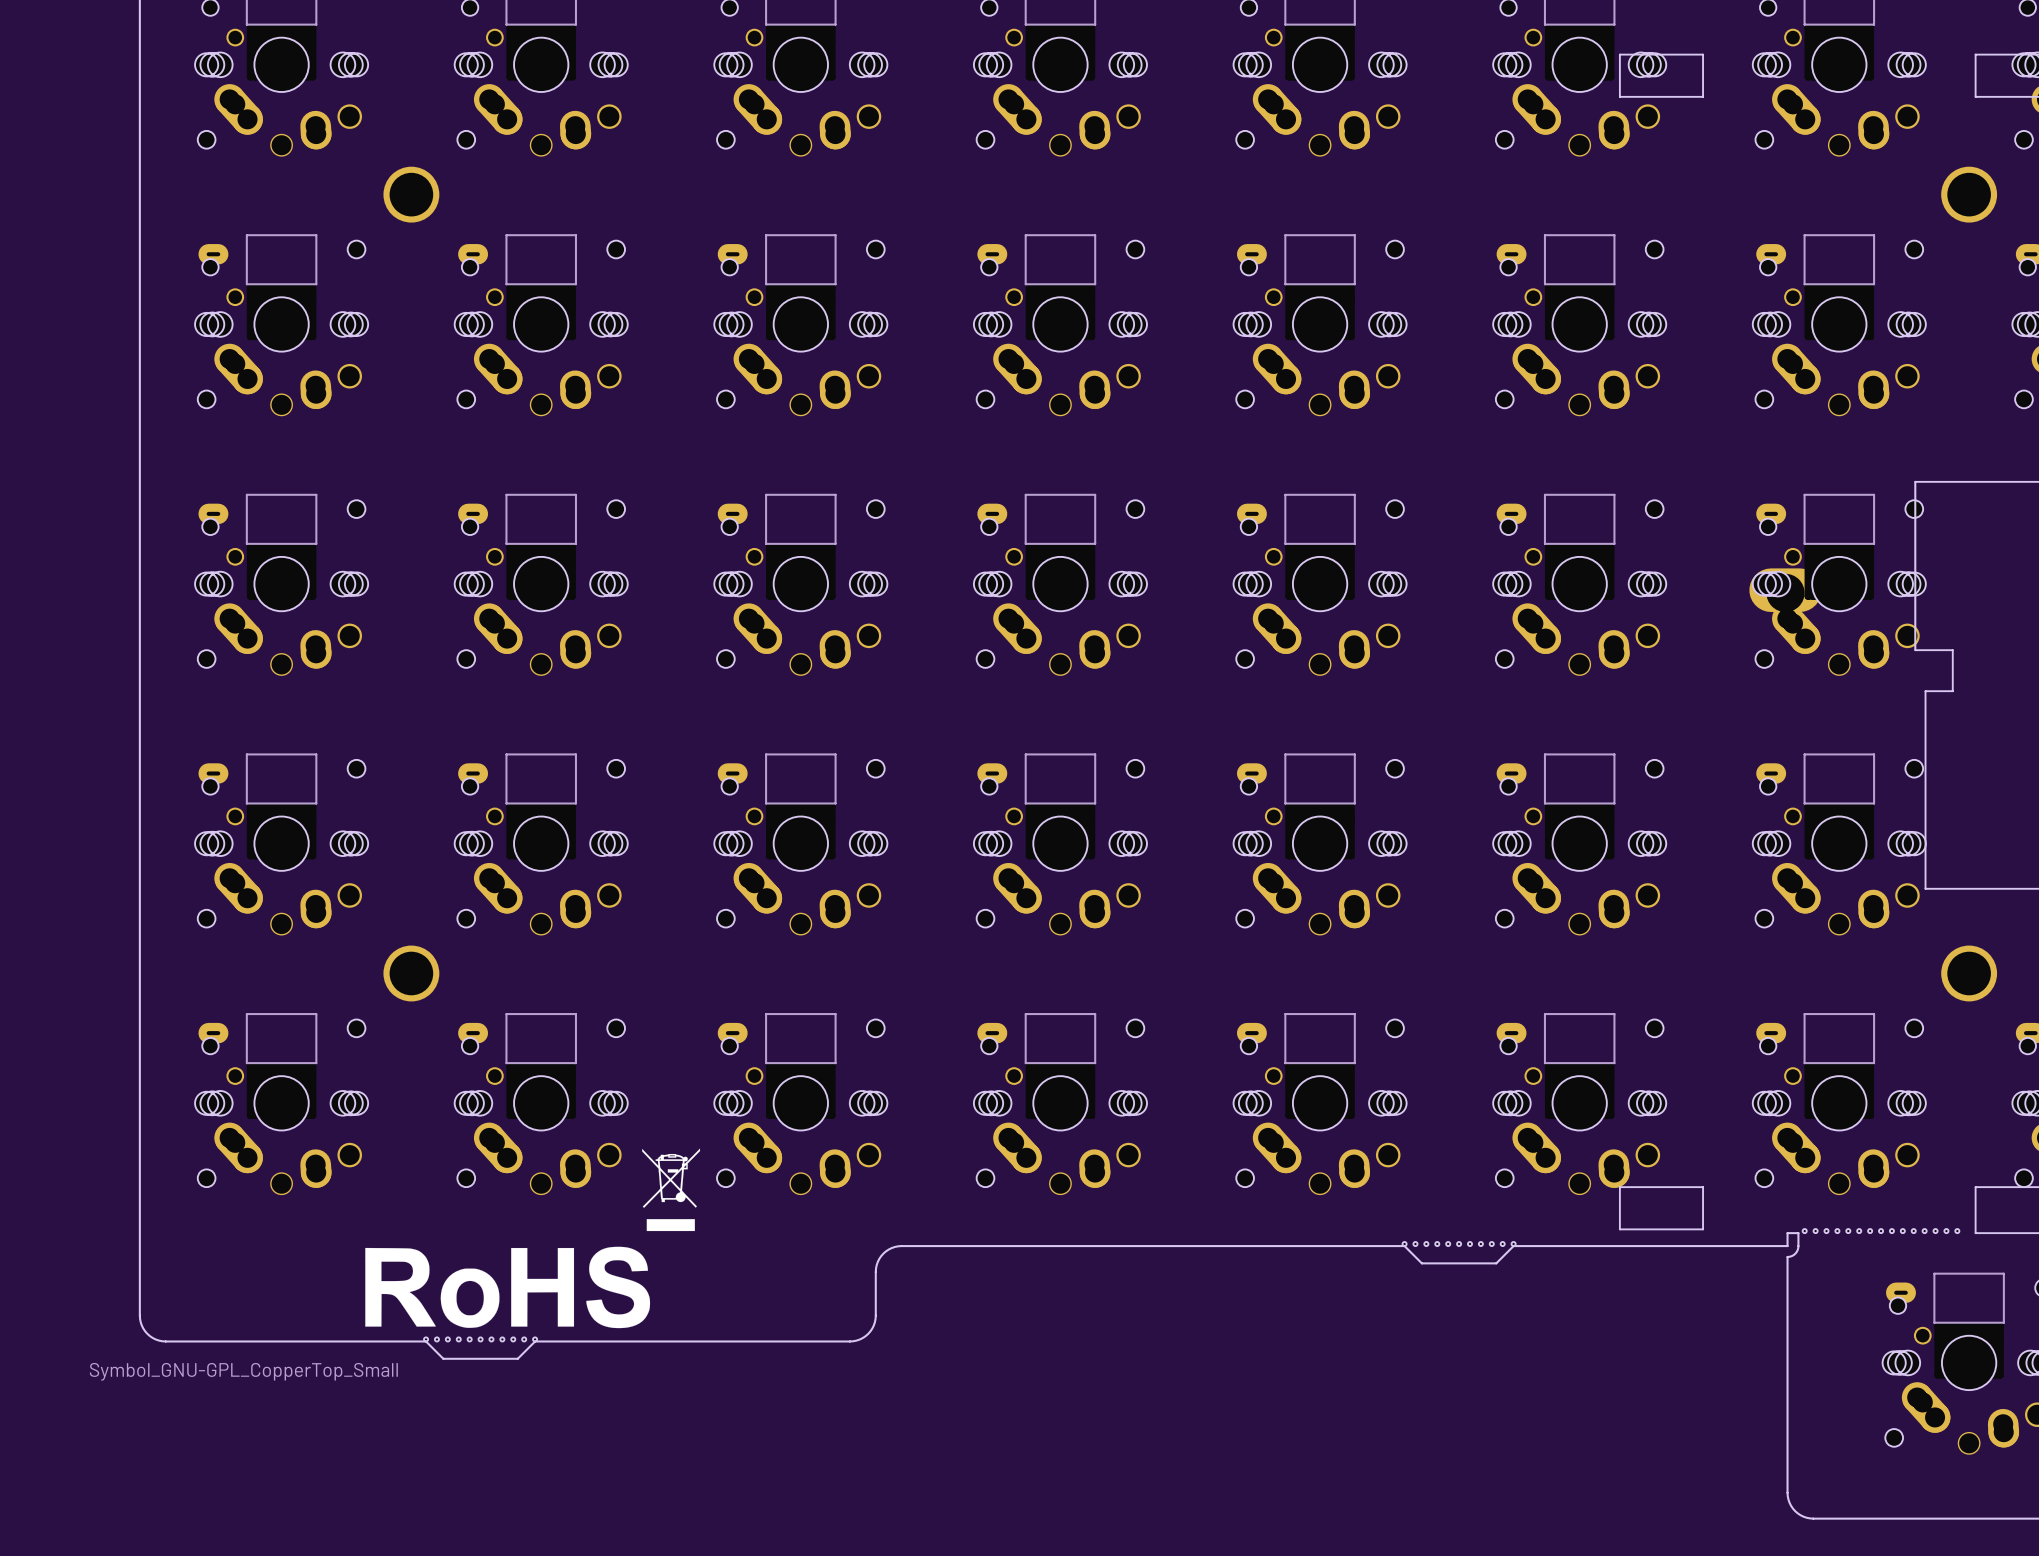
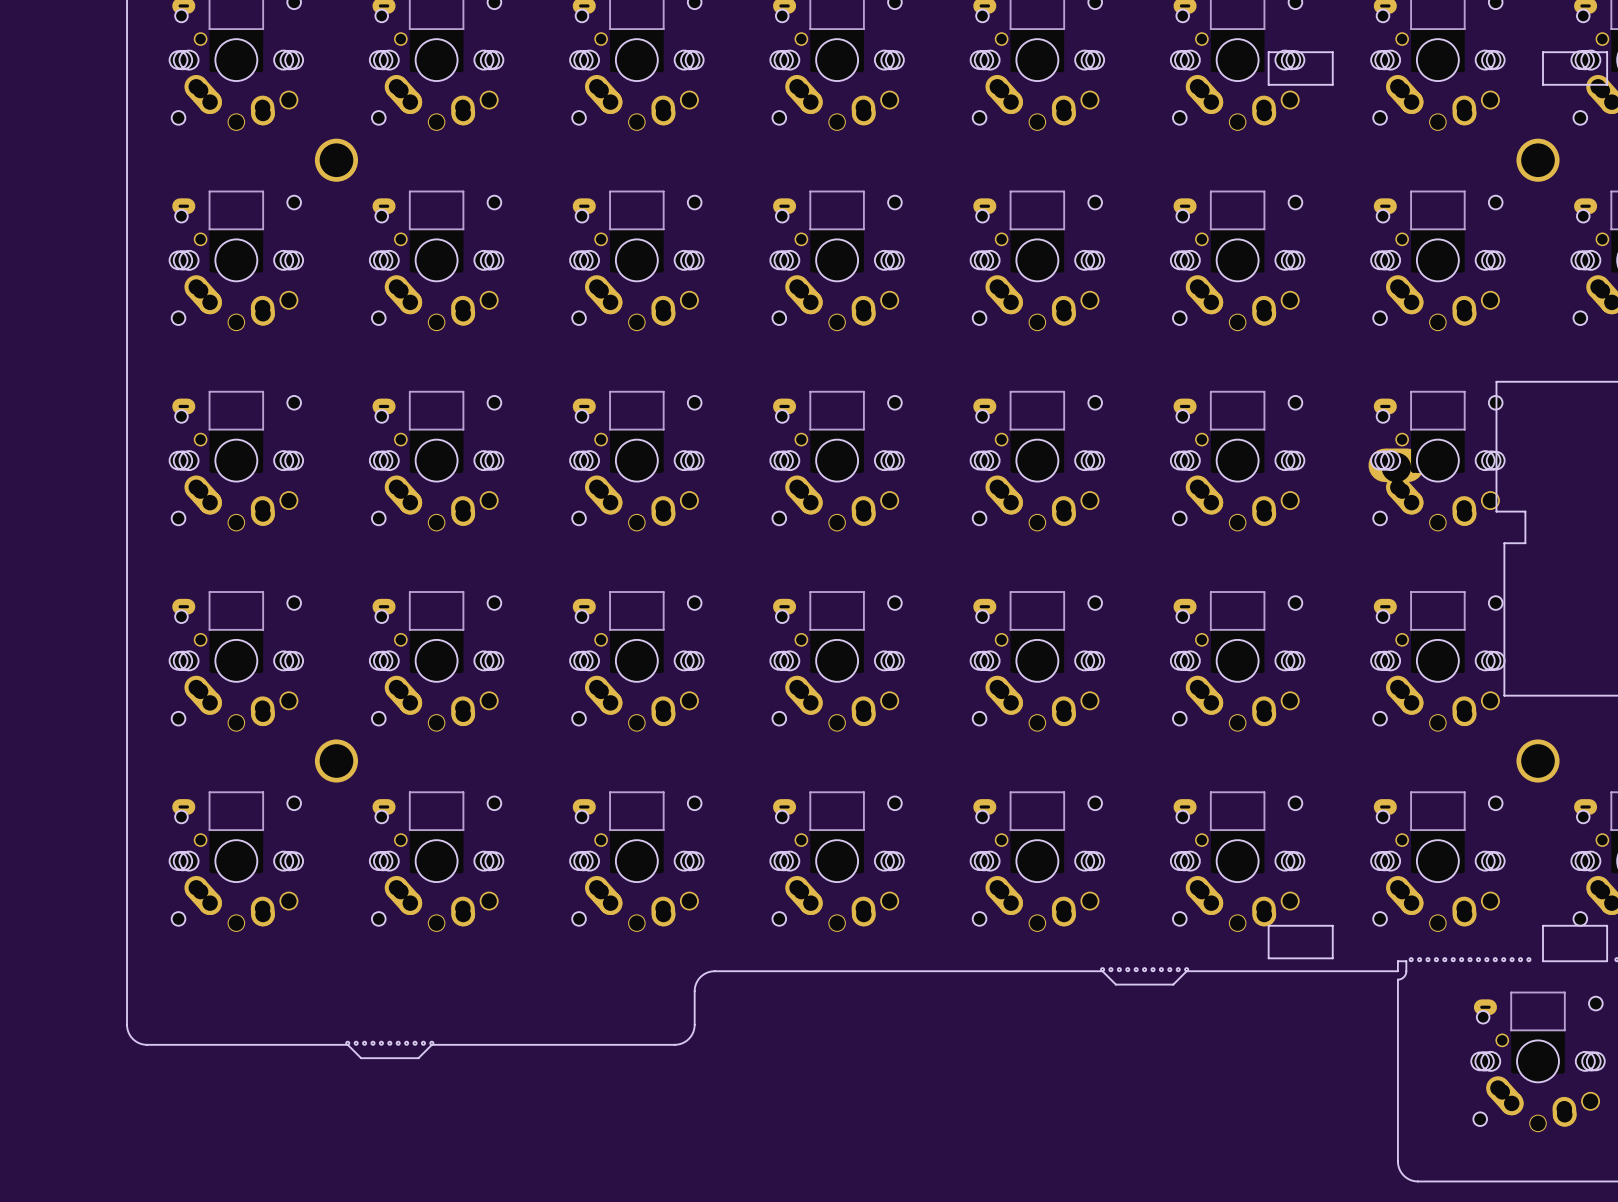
drawing: [365, 1148, 701, 1329] -> none
drawing: [89, 1362, 398, 1381] -> none

